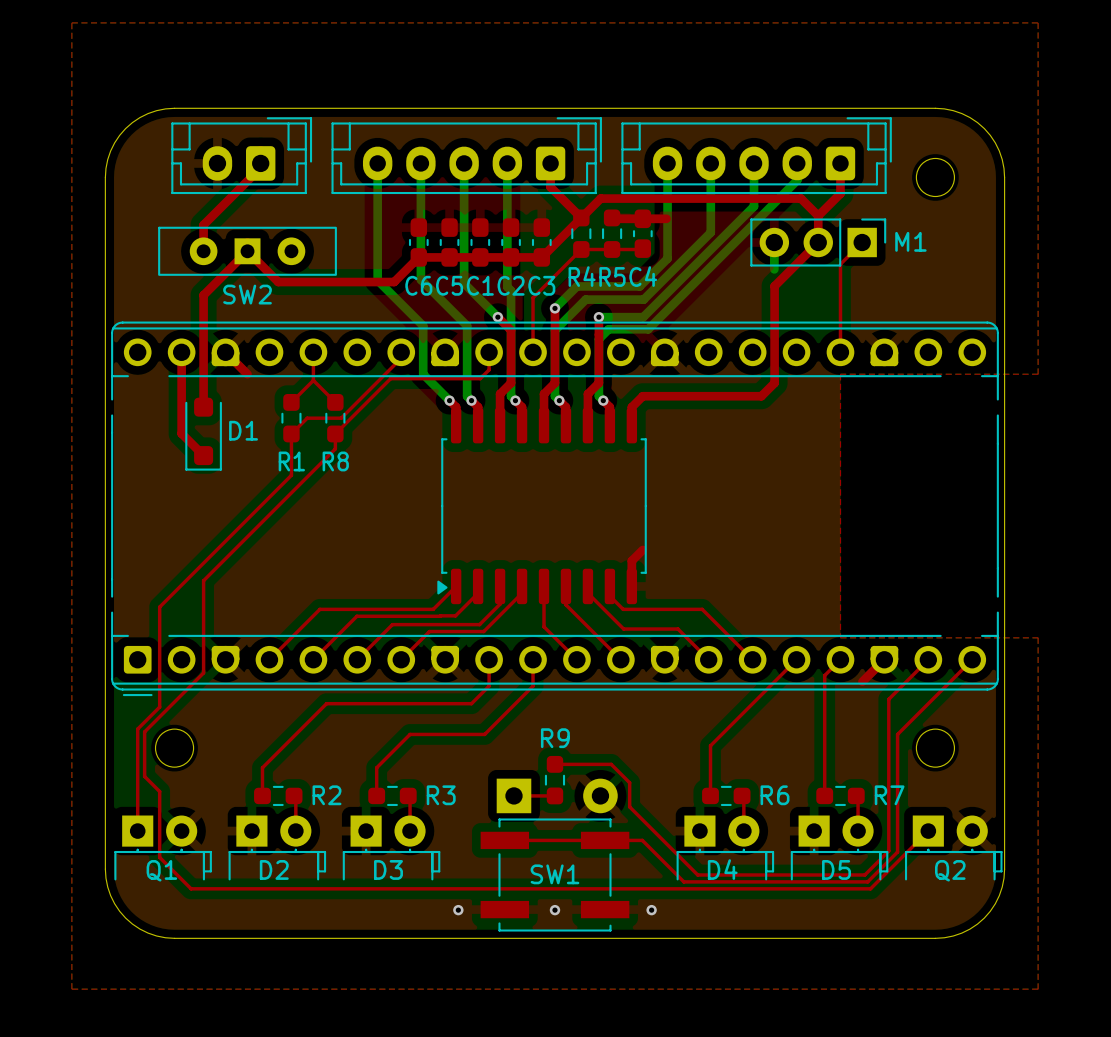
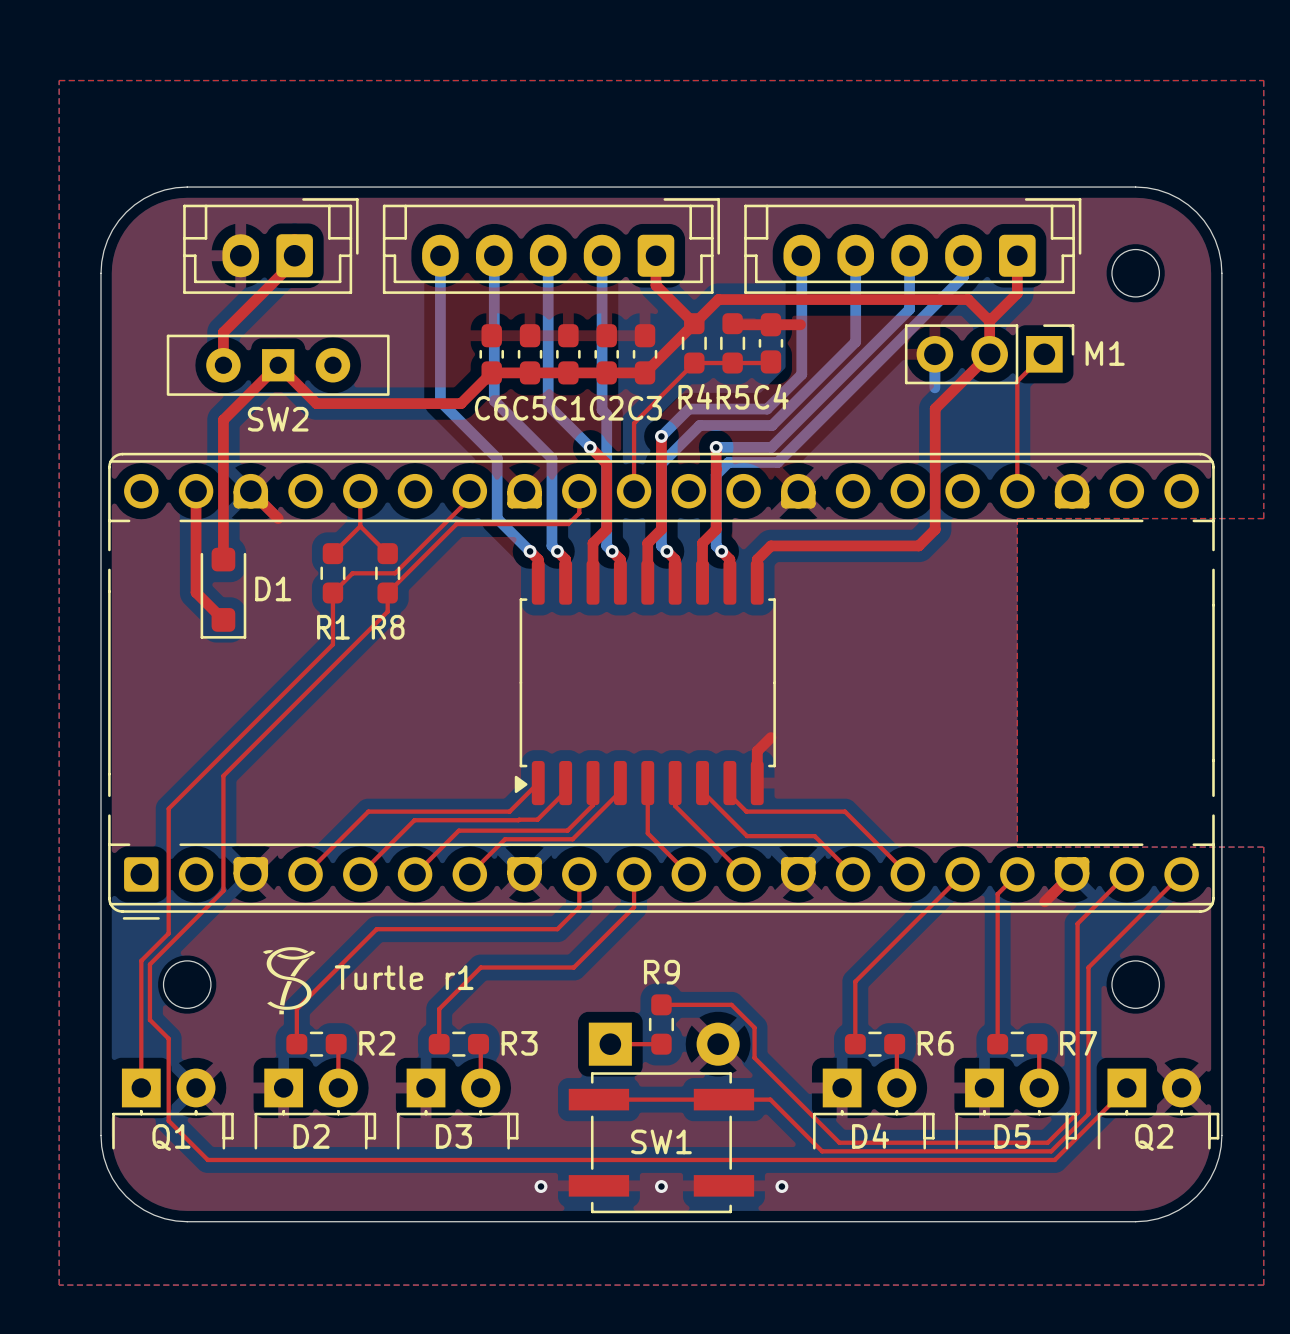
drawing: none -> [262, 947, 316, 1015]
text: none -> Turtle r1 (404, 977)

